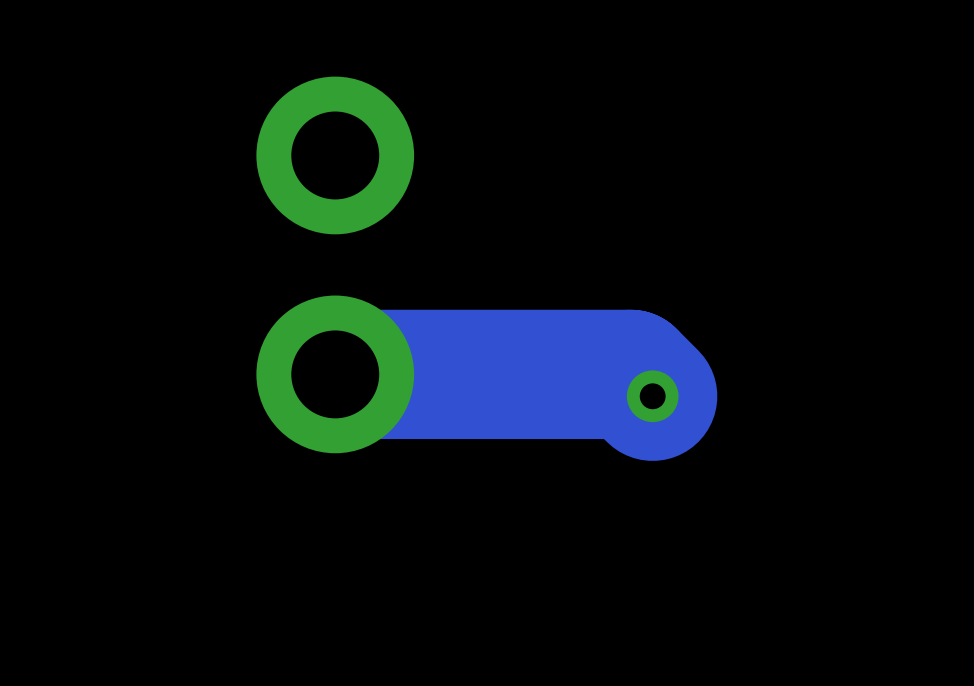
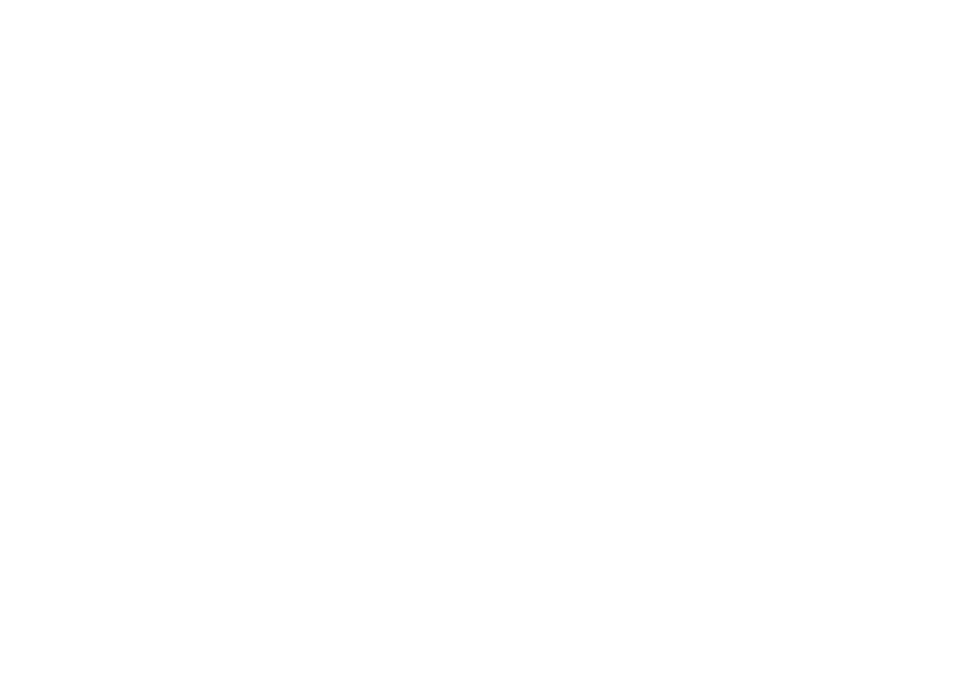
part: (335, 264) -> none
track: (335, 374) (630, 374) (652, 396) -> none
via: (652, 396) -> none

